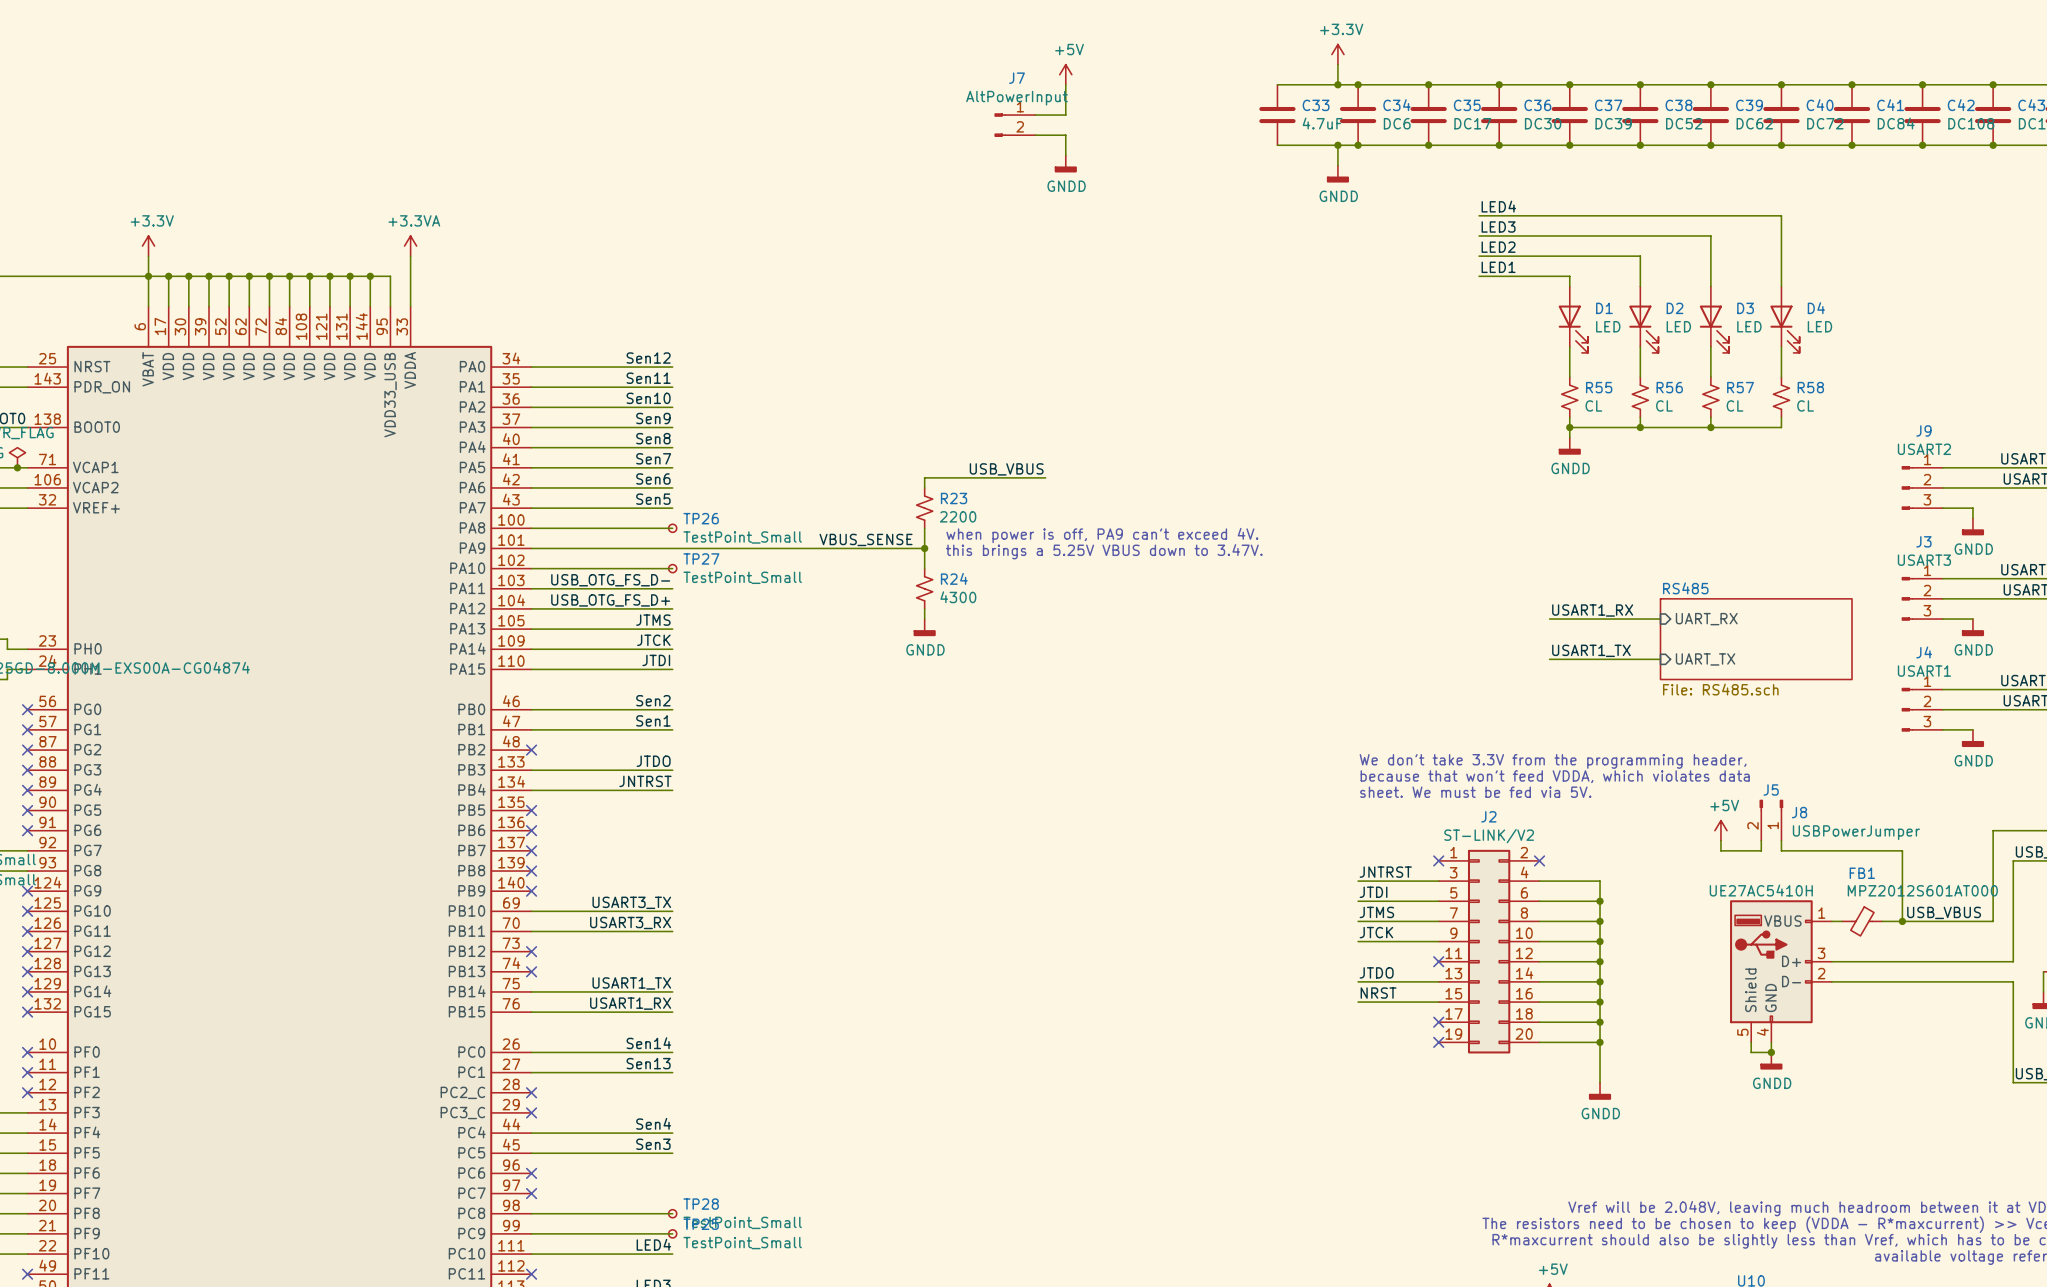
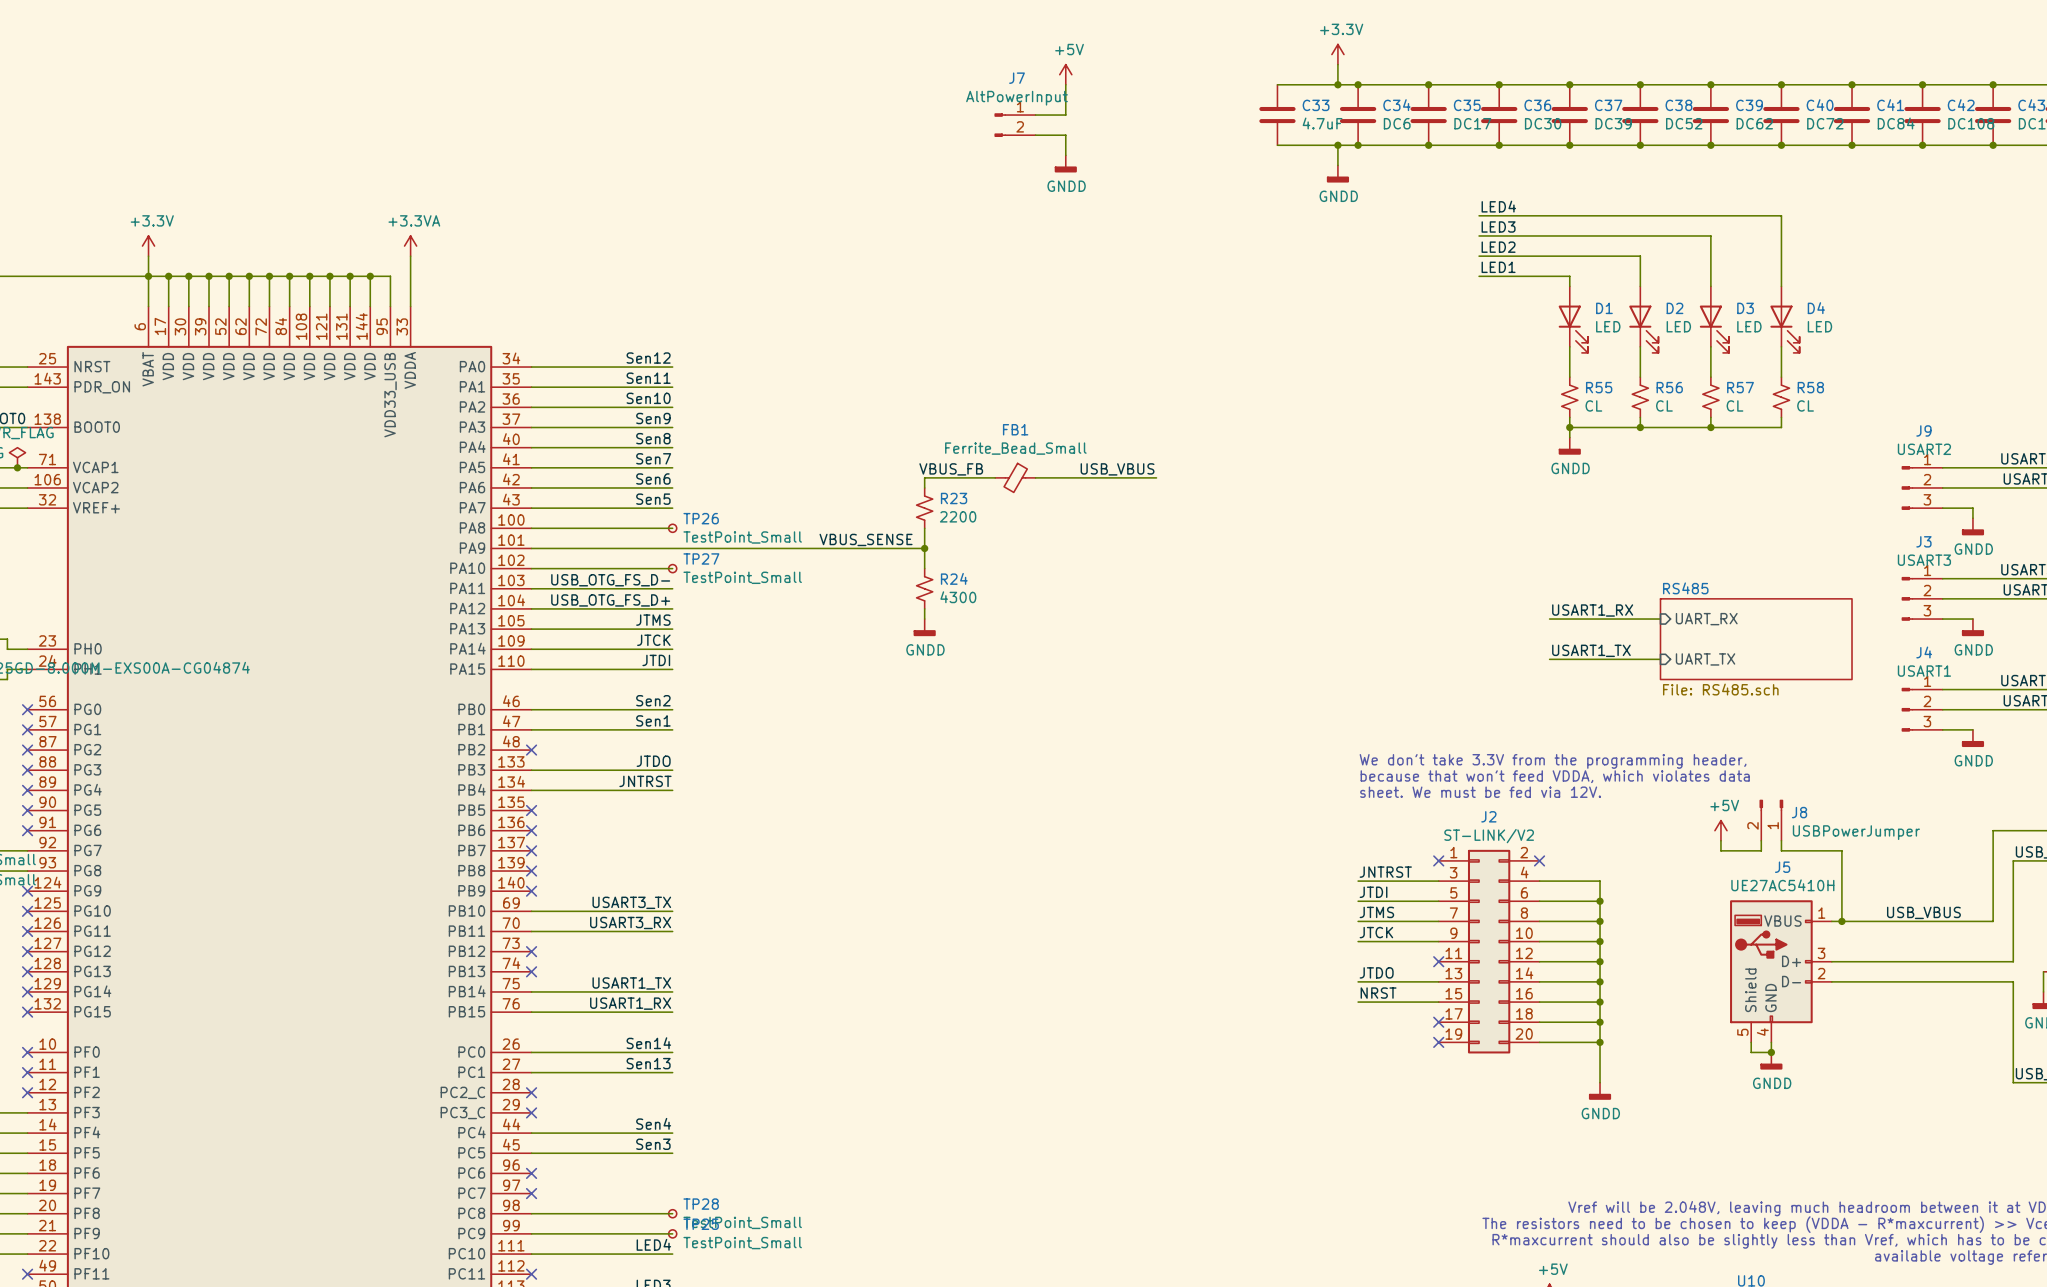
label: none -> VBUS_FB (951, 469)
label position: USB_VBUS (1006, 469) -> USB_VBUS (1117, 469)
wire: none -> (1045, 477) (1156, 477)
text: when power is off, PA9 can't exceed 4V. (1102, 535) -> none
text: this brings a 5.25V VBUS down to 3.47V. (1104, 551) -> none
J5 name position: J5 (1771, 790) -> J5 (1782, 867)
text: sheet. We must be fed via 5V. (1475, 792) -> sheet. We must be fed via 12V. (1480, 792)
wire: (1841, 850) (1902, 850) (1902, 921) -> (1841, 850) (1841, 921) (1882, 921)
J5 value position: UE27AC5410H (1761, 890) -> UE27AC5410H (1782, 885)
FB1 value: MPZ2012S601AT000 (1922, 890) -> Ferrite_Bead_Small (1015, 448)
label position: USB_VBUS (1944, 912) -> USB_VBUS (1923, 912)
junction: none -> (1841, 921)
FB1 position: (1862, 921) -> (1015, 477)
junction: (1902, 921) -> none

